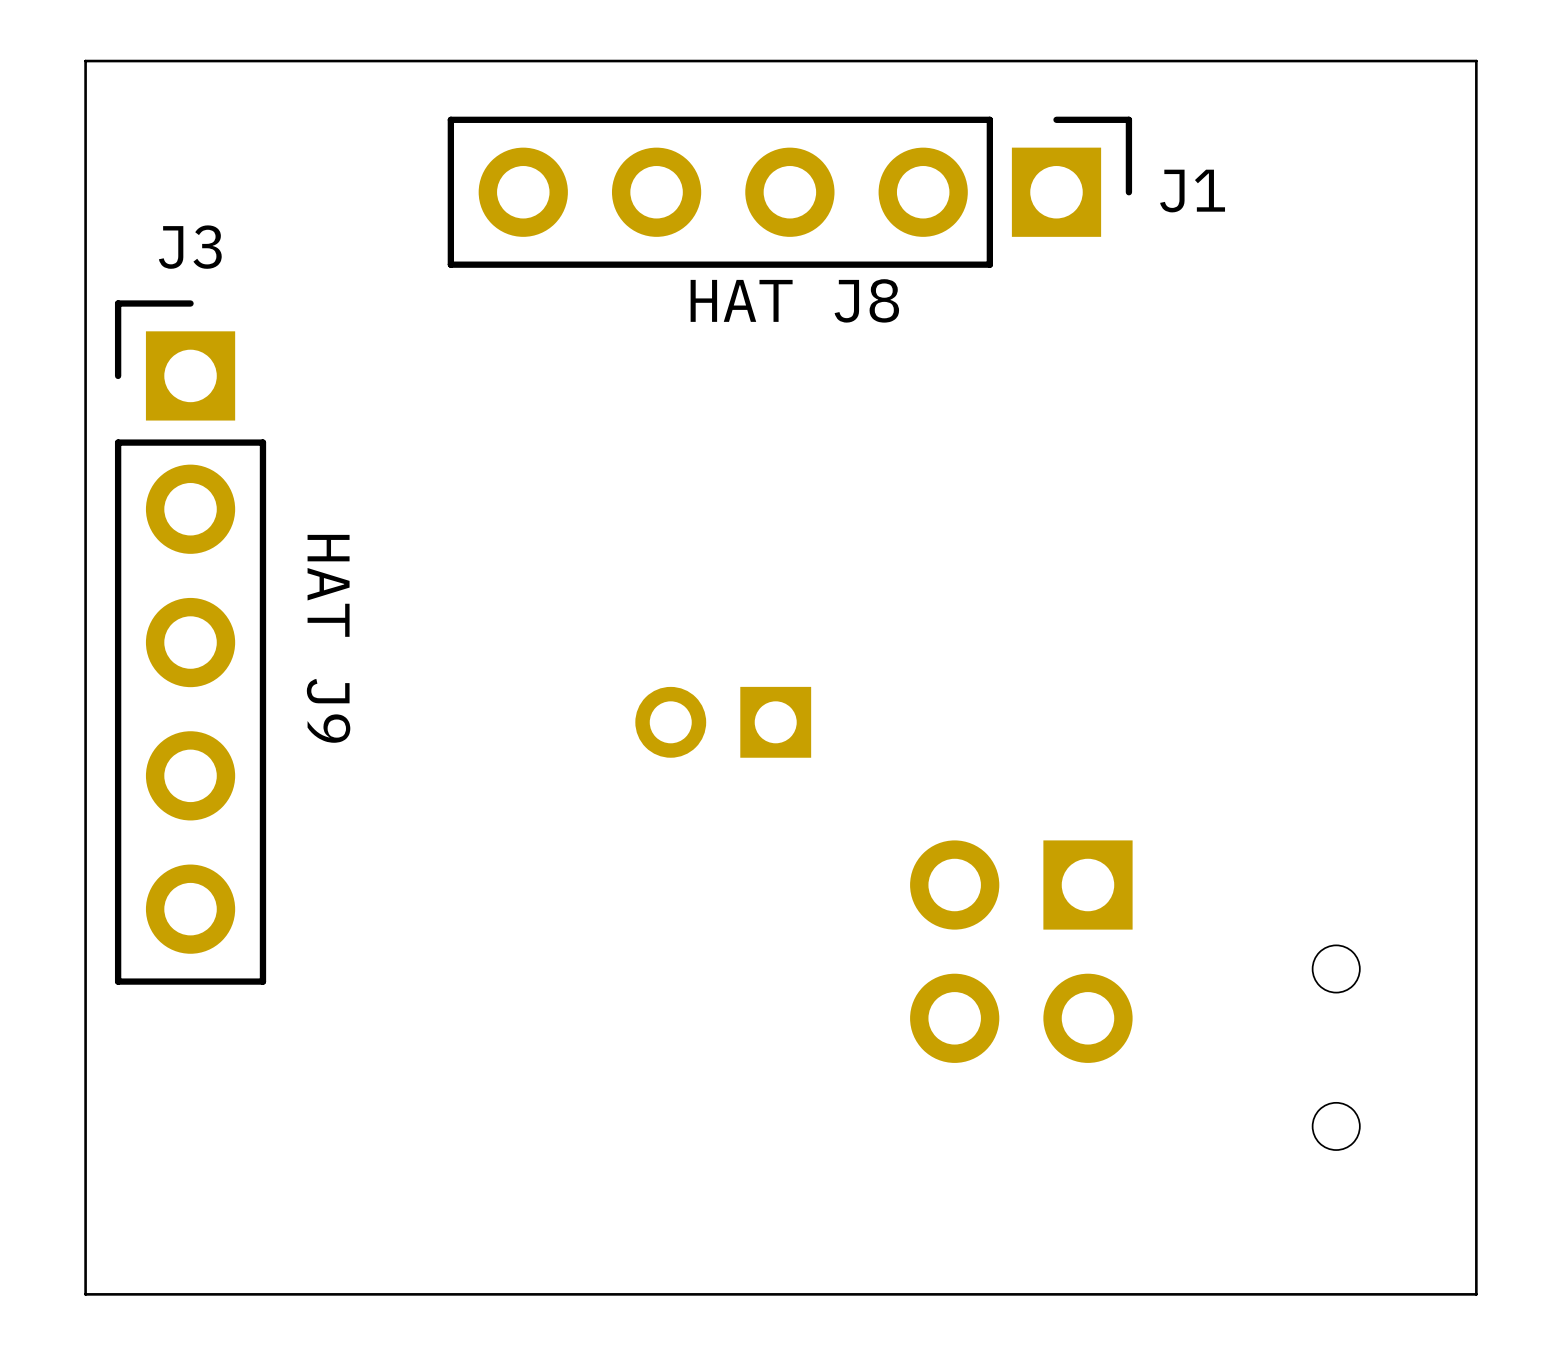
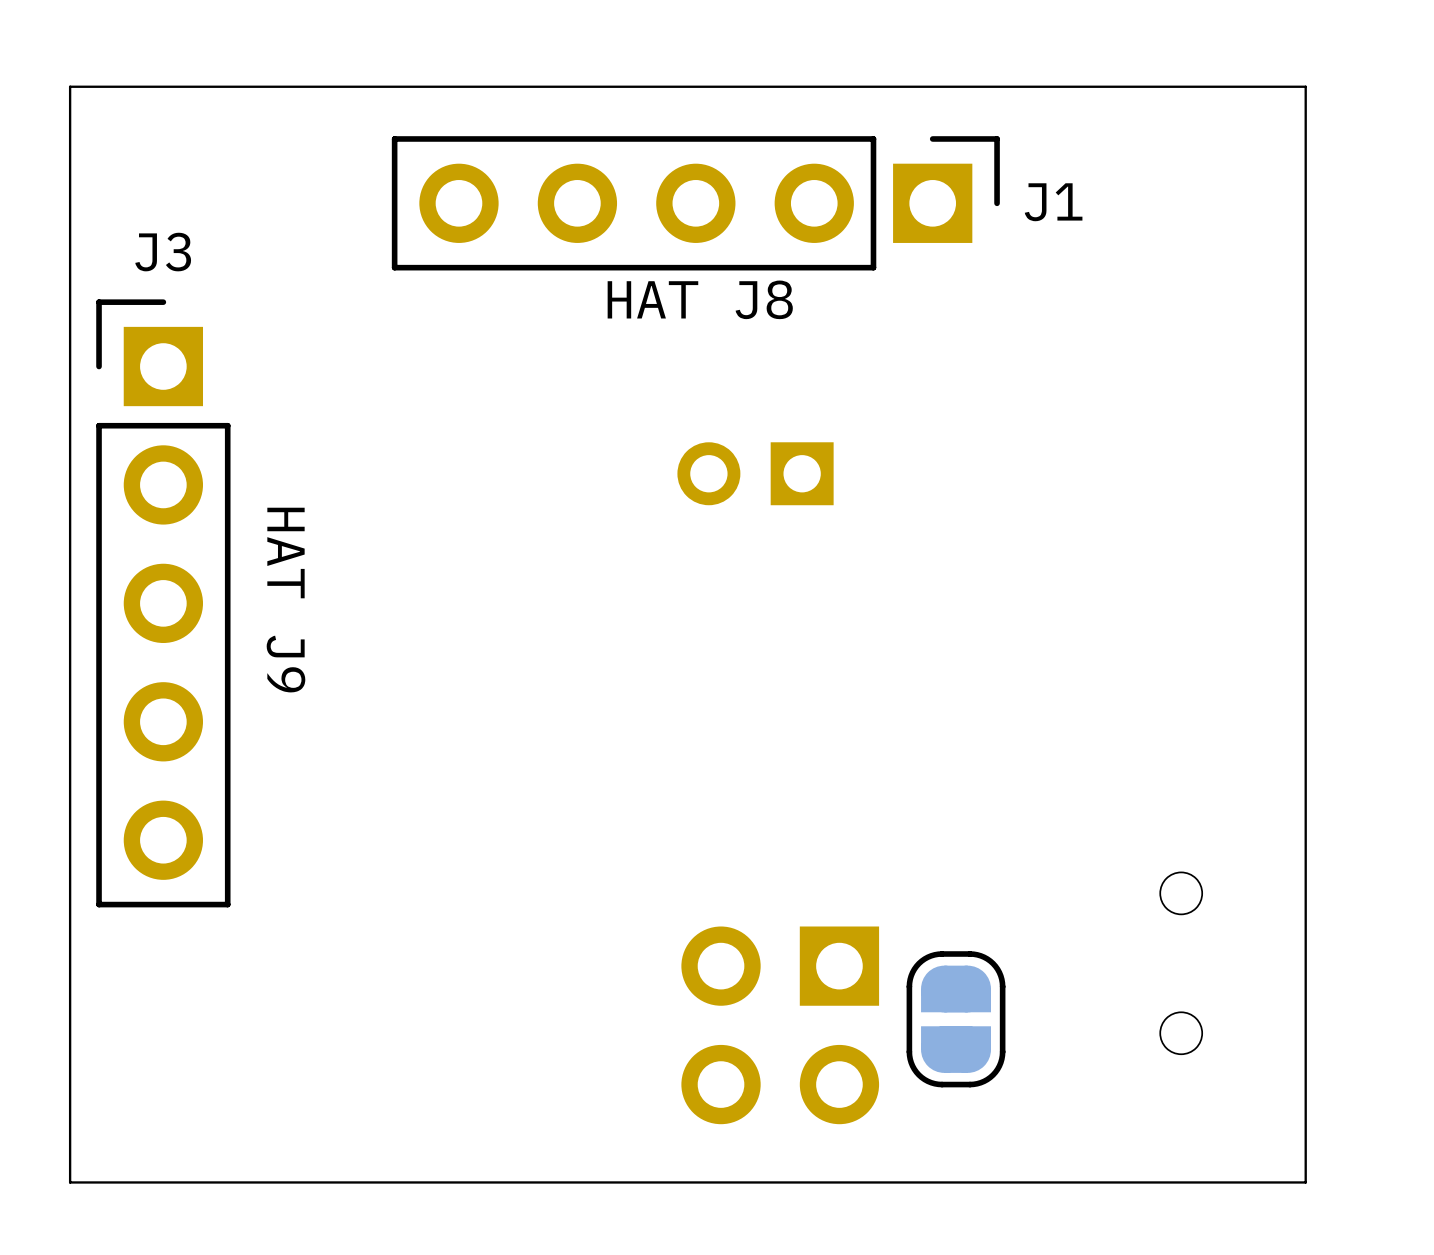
part position: (723, 722) -> (755, 473)
part position: (1021, 951) -> (780, 1025)
part: none -> (956, 1019)

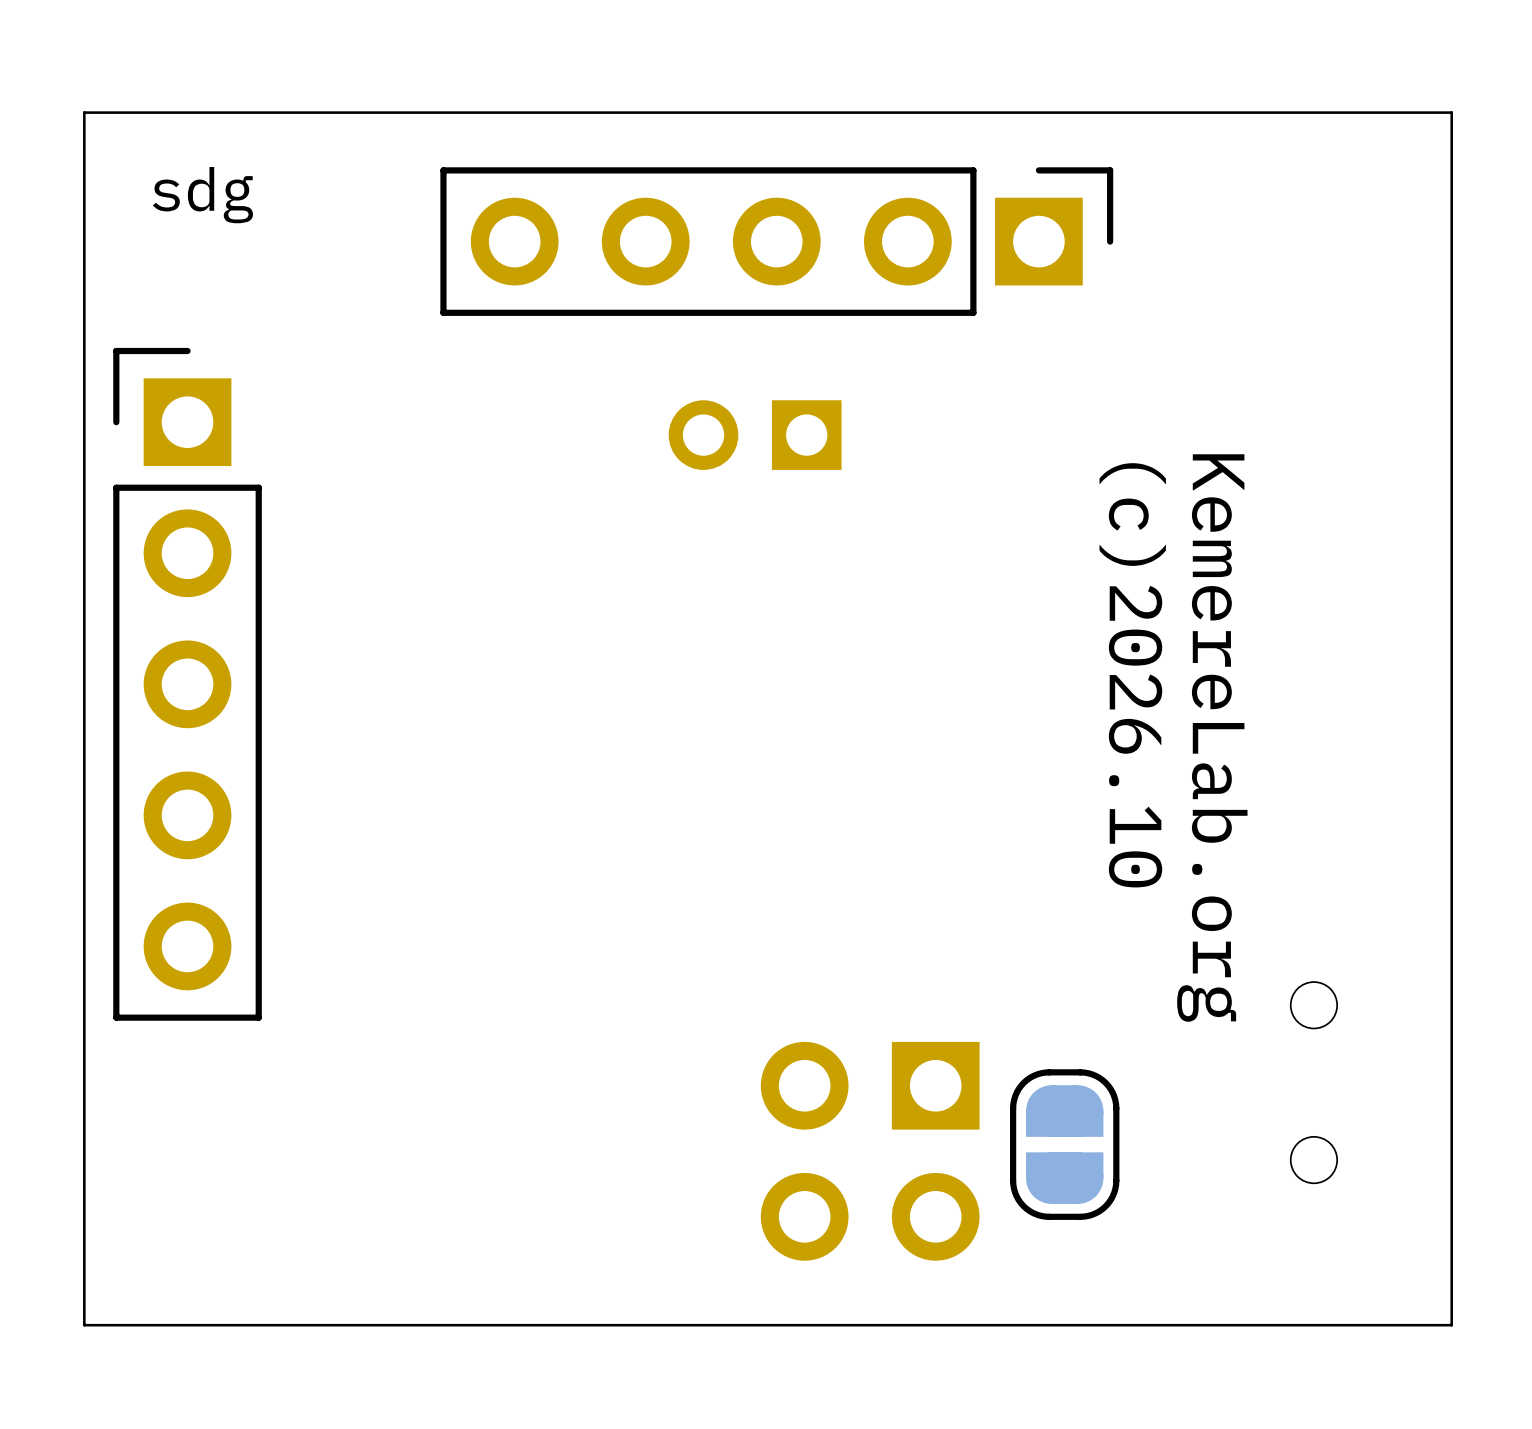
text: none -> sdg (202, 195)
J1 name: J1 (1053, 202) -> none
J3 name: J3 (163, 252) -> none
text: HAT J8 (700, 299) -> none
part position: (755, 473) -> (755, 435)
text: none -> (c)2026.10 (1132, 675)
text: HAT J9 (285, 600) -> none
text: none -> KemereLab.org (1212, 738)

